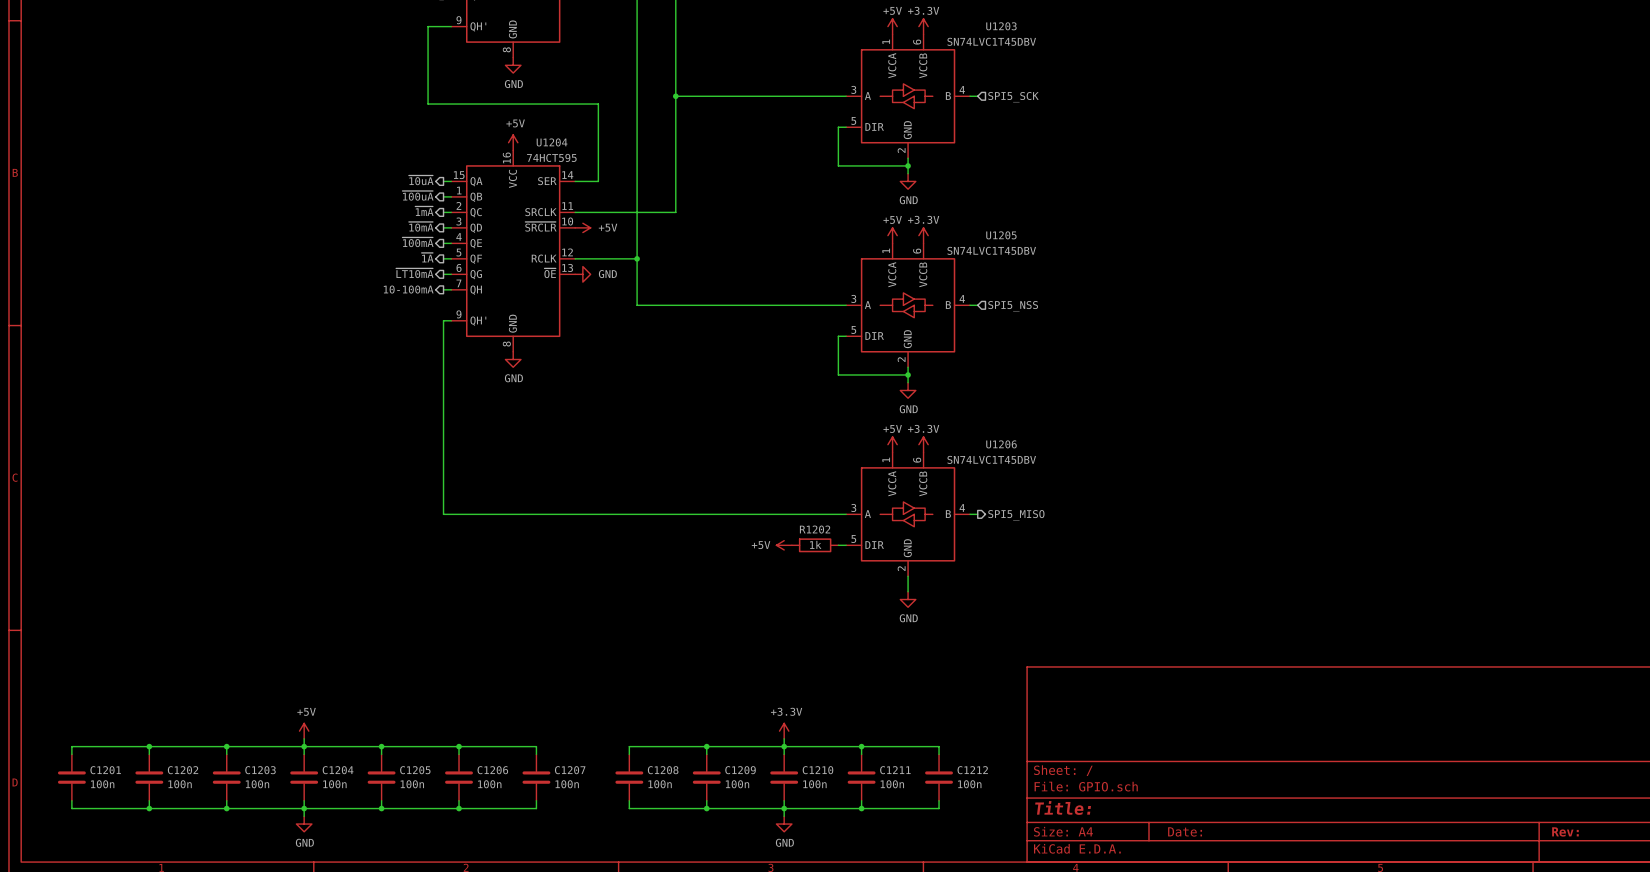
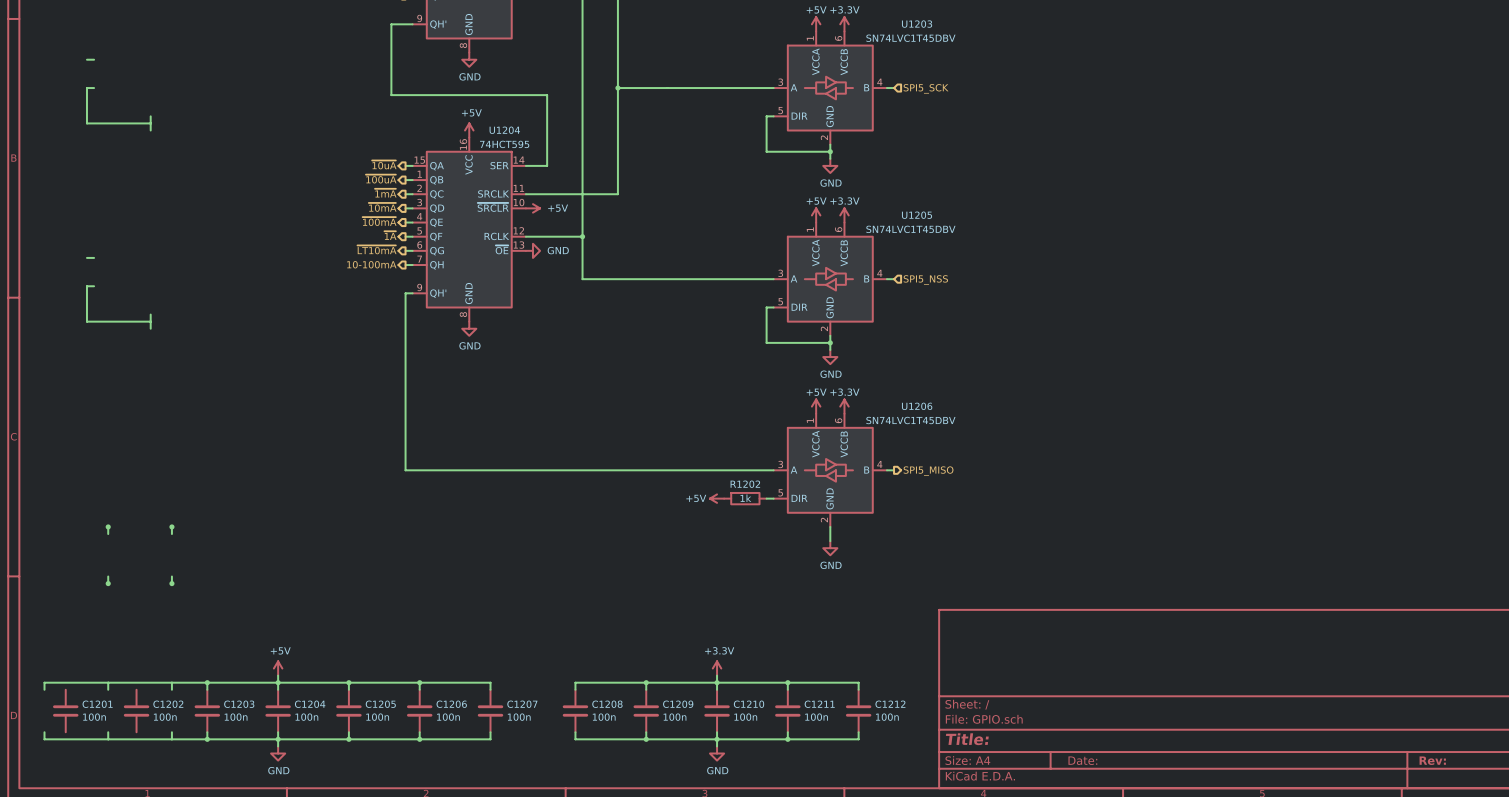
wire: none -> (86, 59) (94, 59)
wire: none -> (94, 88) (86, 88) (86, 123) (150, 123)
wire: none -> (150, 116) (150, 130)
wire: none -> (86, 257) (94, 257)
wire: none -> (94, 286) (86, 286) (86, 321) (150, 321)
wire: none -> (150, 314) (150, 328)
wire: none -> (108, 526) (108, 534)
junction: none -> (108, 526)
wire: none -> (171, 526) (171, 534)
junction: none -> (171, 526)
wire: none -> (108, 576) (108, 583)
wire: none -> (171, 576) (171, 583)
junction: none -> (108, 583)
junction: none -> (171, 583)
wire: (71, 746) (71, 754) -> (65, 682) (44, 682) (44, 689)
wire: (149, 746) (149, 754) -> (108, 682) (108, 689)
junction: (149, 746) -> none
wire: none -> (171, 682) (171, 689)
wire: (71, 800) (71, 808) -> (44, 732) (44, 739) (65, 739)
wire: (149, 800) (149, 808) -> (108, 732) (108, 739)
wire: none -> (171, 732) (171, 739)
junction: (149, 808) -> none

